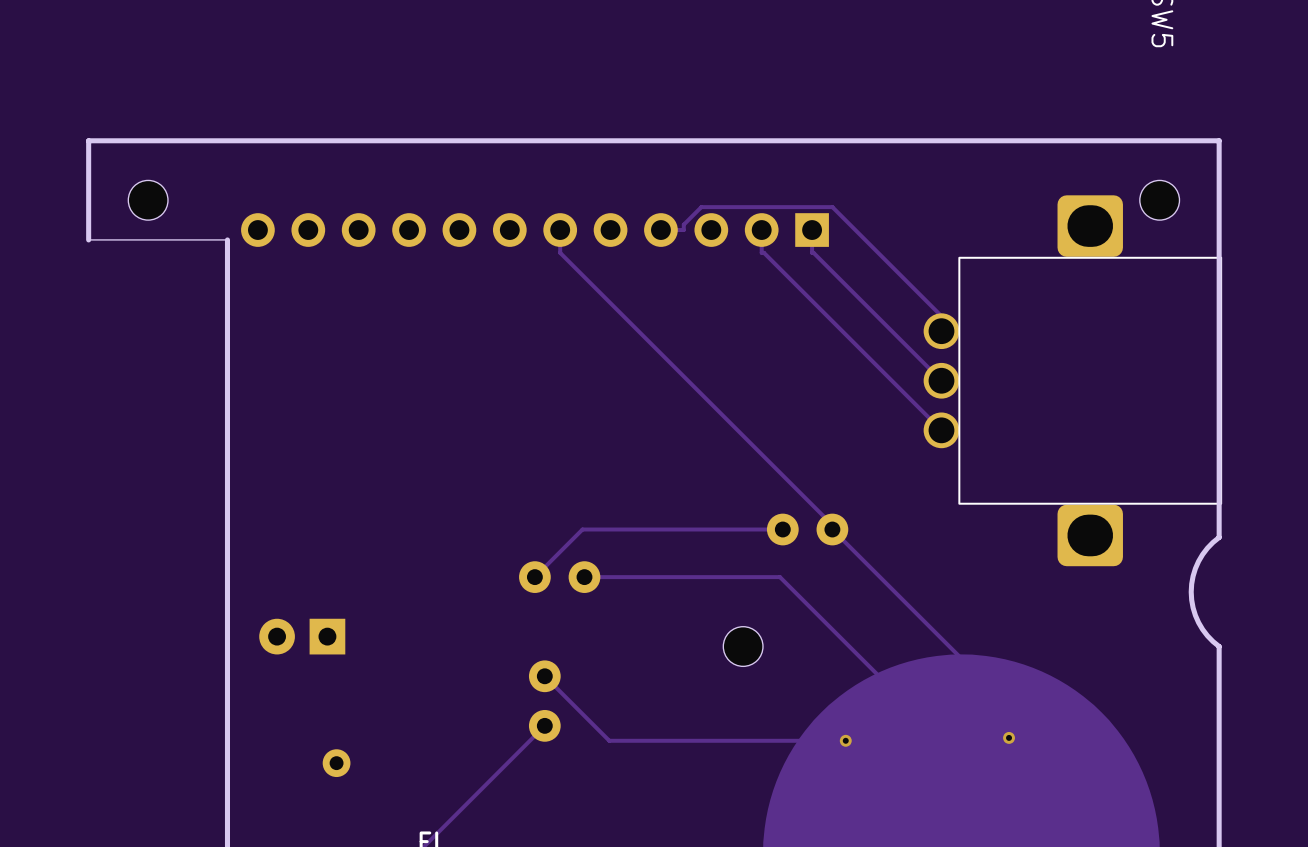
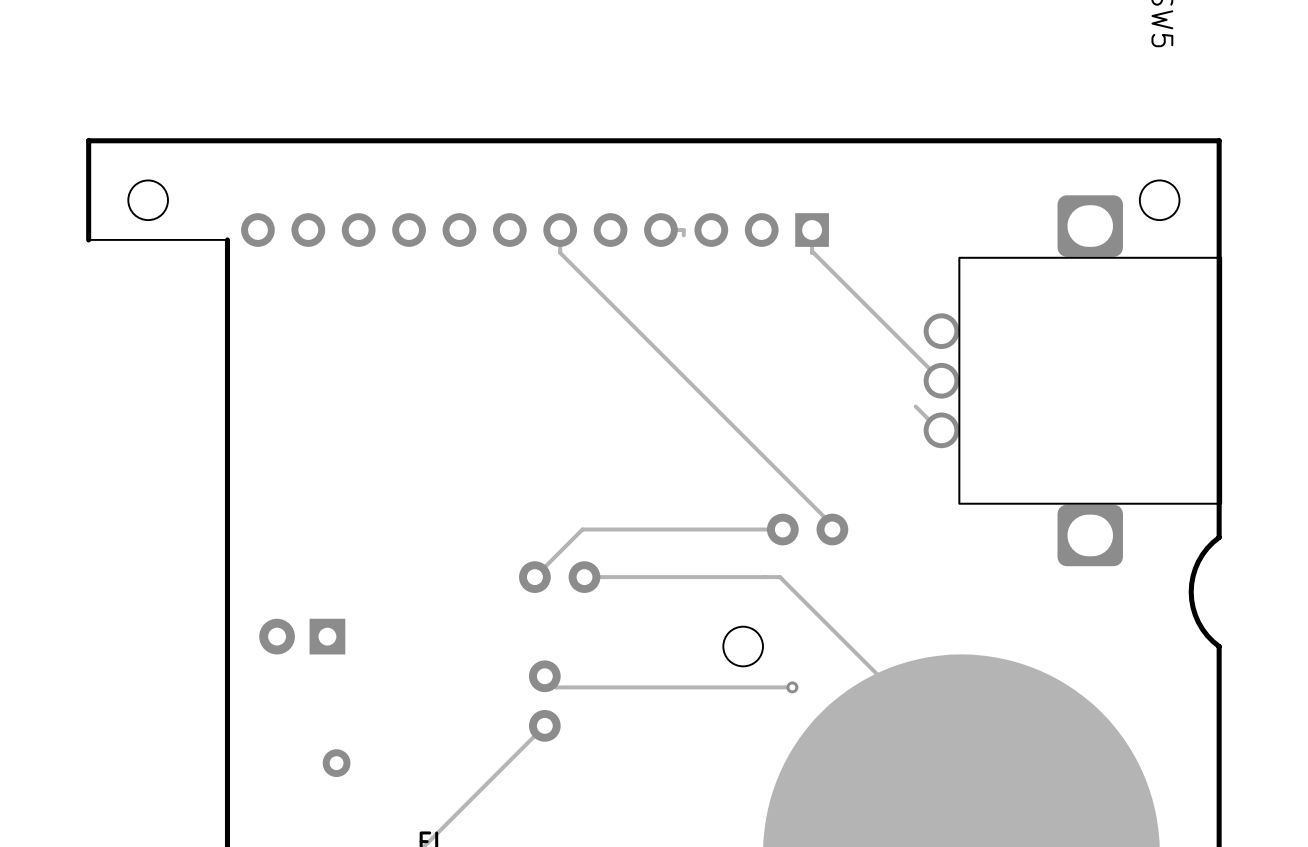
track: (683, 230) (683, 224) (701, 207) (832, 207) (941, 316) (941, 331) -> (683, 230) (683, 235)
track: (761, 230) (761, 252) (764, 252) (941, 430) -> (915, 406) (941, 430)
track: (832, 529) (1009, 706) (1009, 737) -> none
track: (555, 687) (609, 740) (845, 740) -> (555, 687) (792, 687)
via: (1009, 737) -> none
via position: (845, 740) -> (792, 687)

